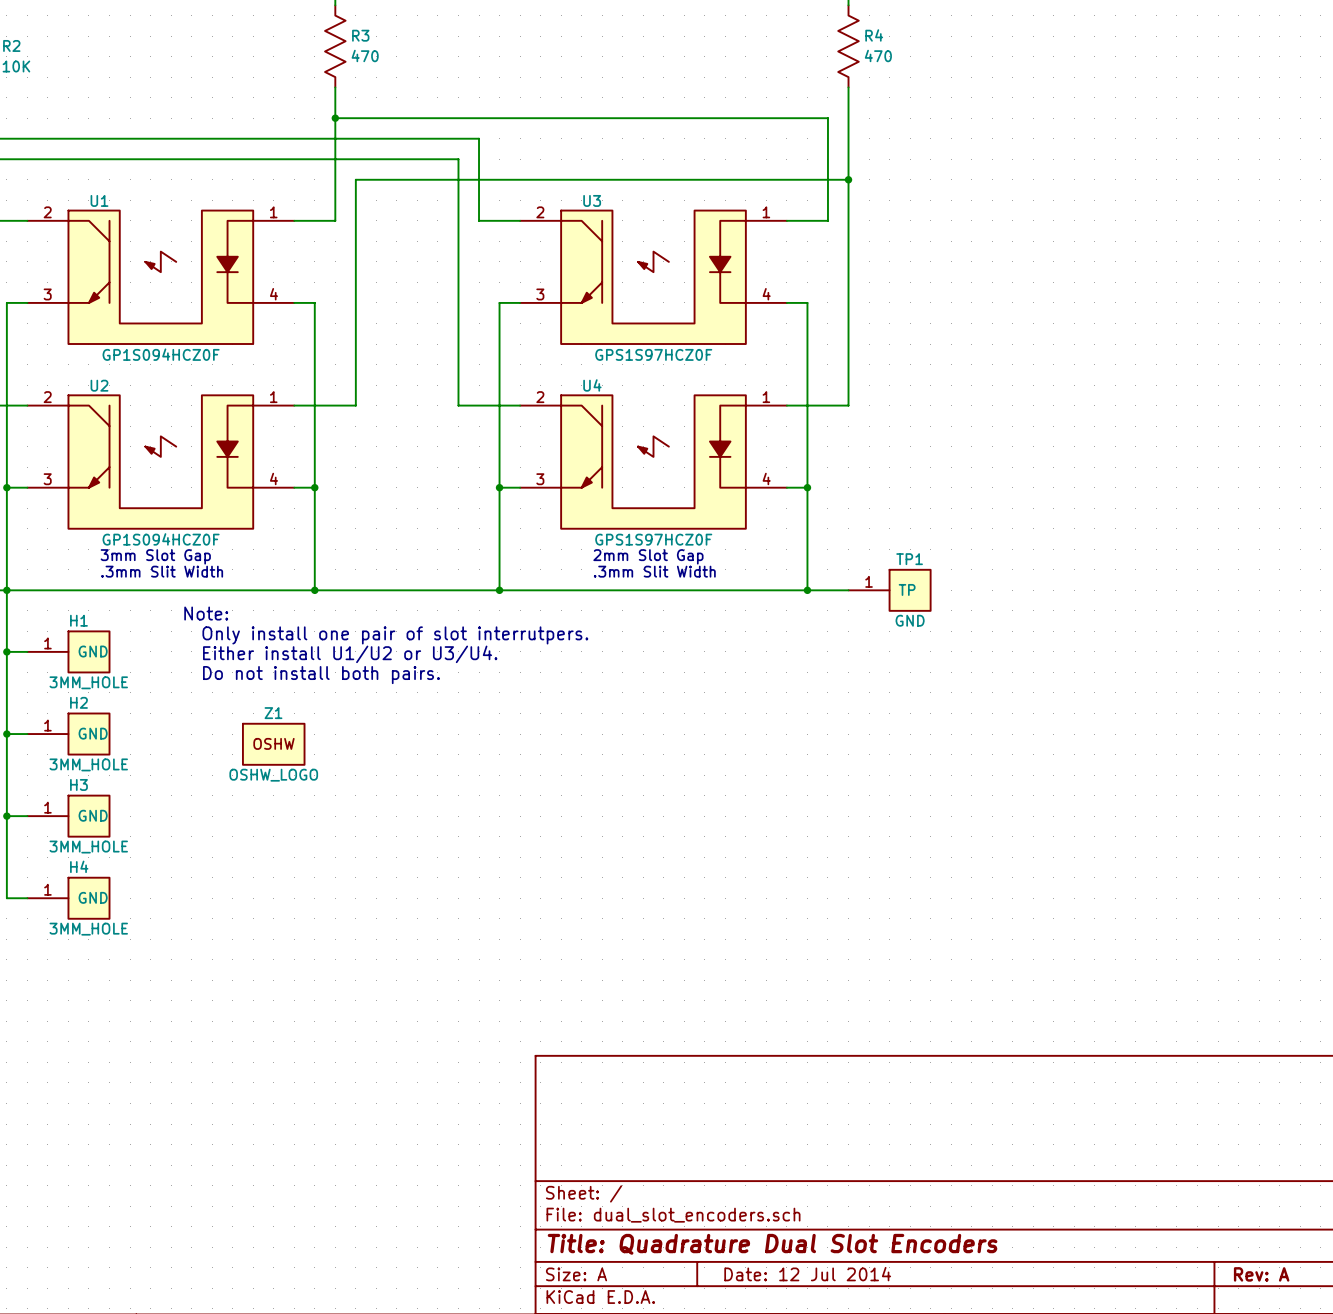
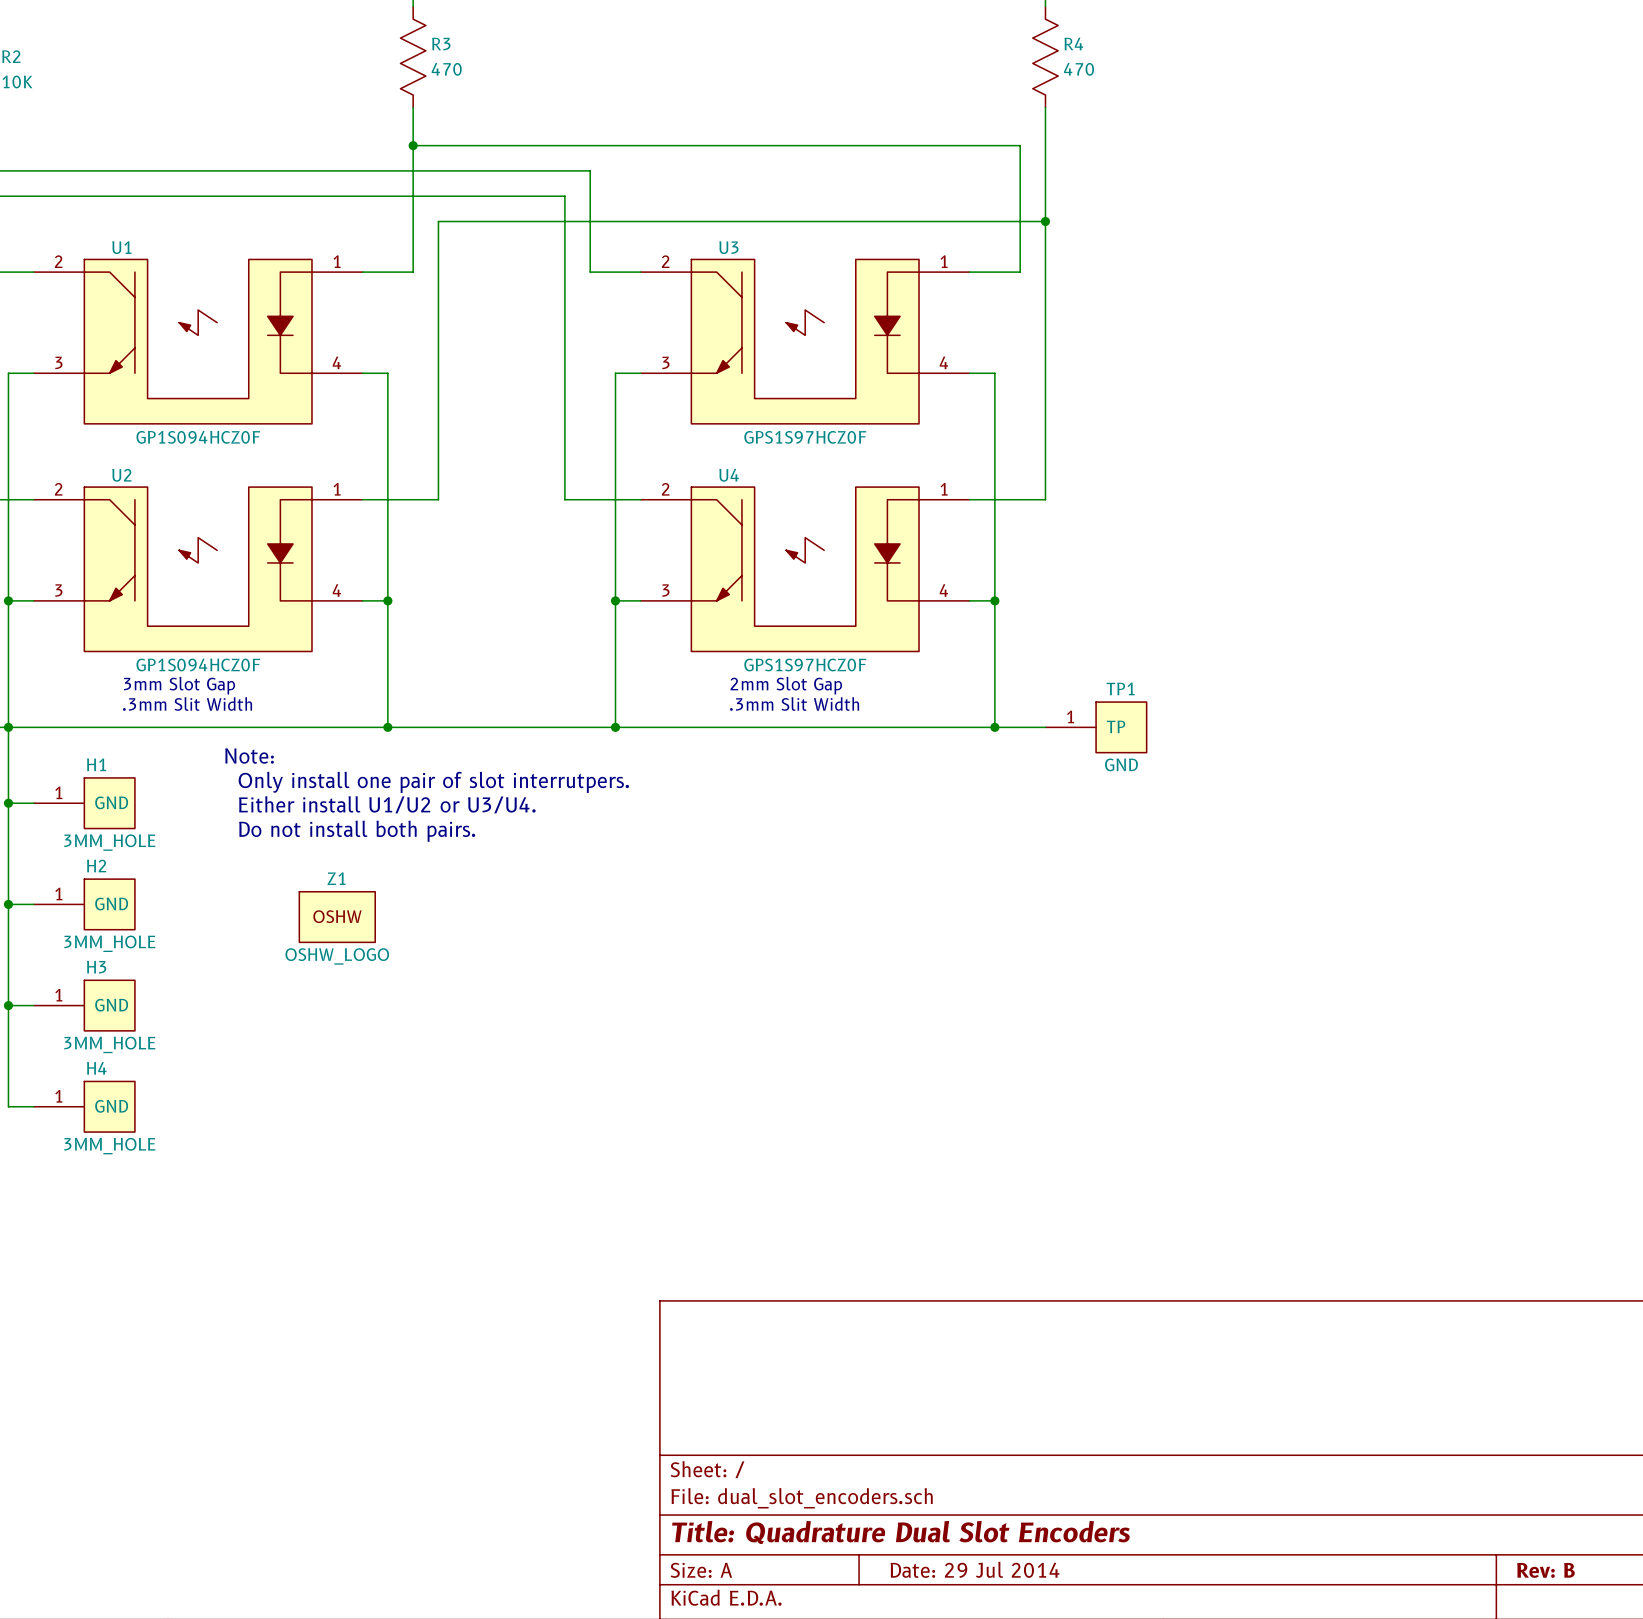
title block: Date: 12 Jul 2014 (807, 1274) -> Date: 29 Jul 2014 (975, 1569)
title block: Rev: A (1261, 1274) -> Rev: B (1545, 1570)

